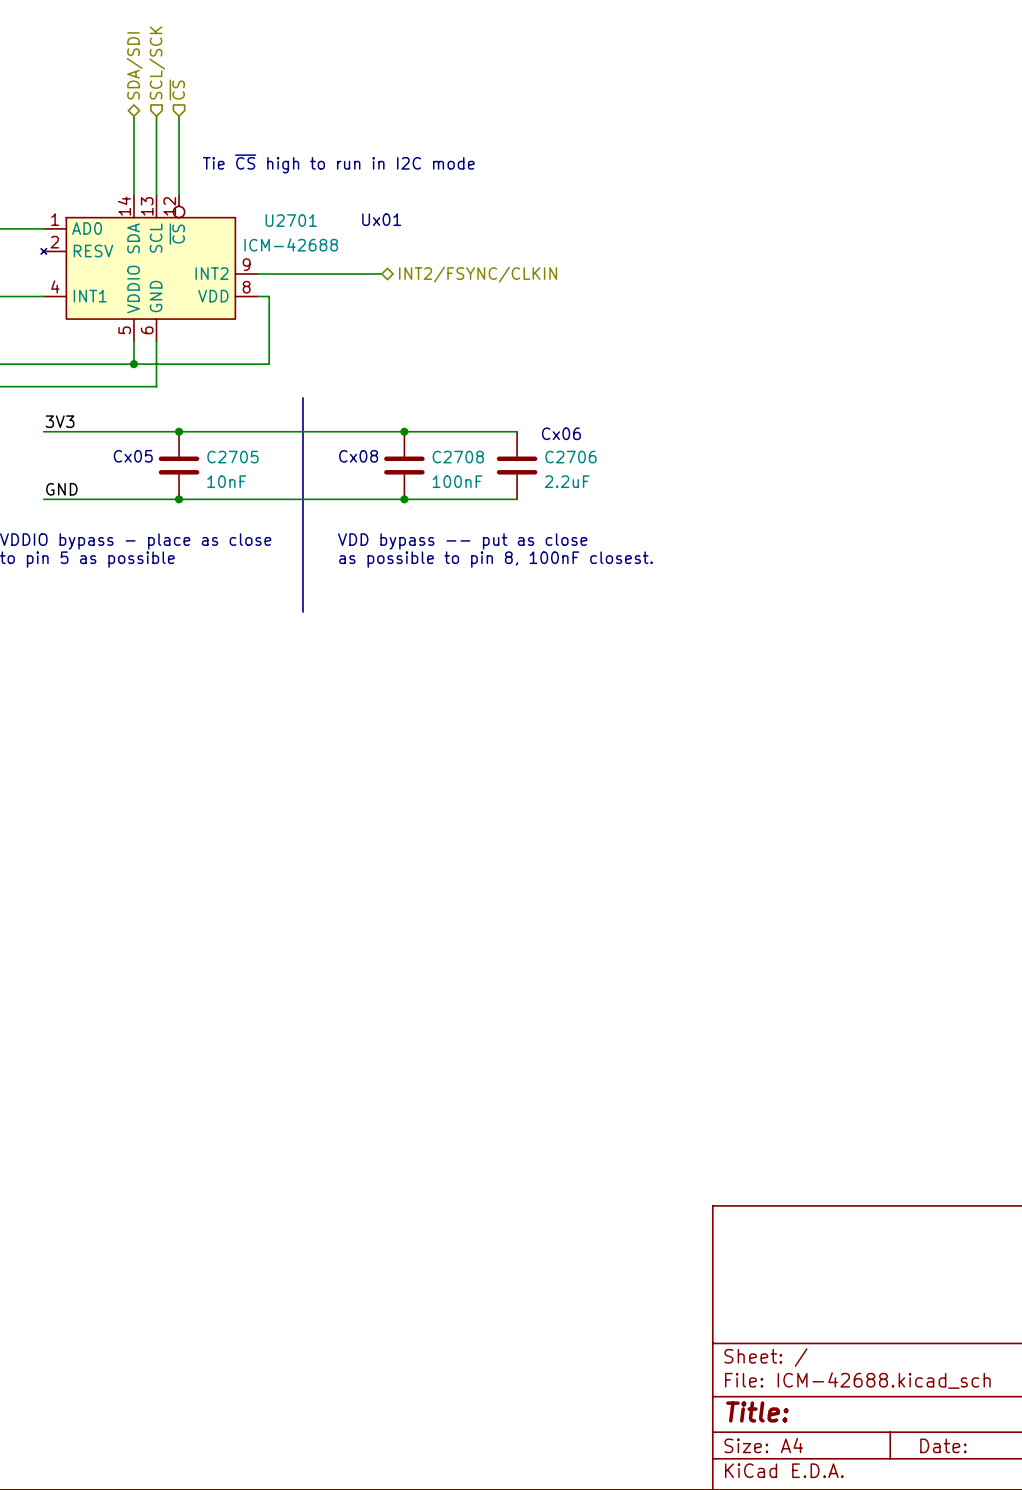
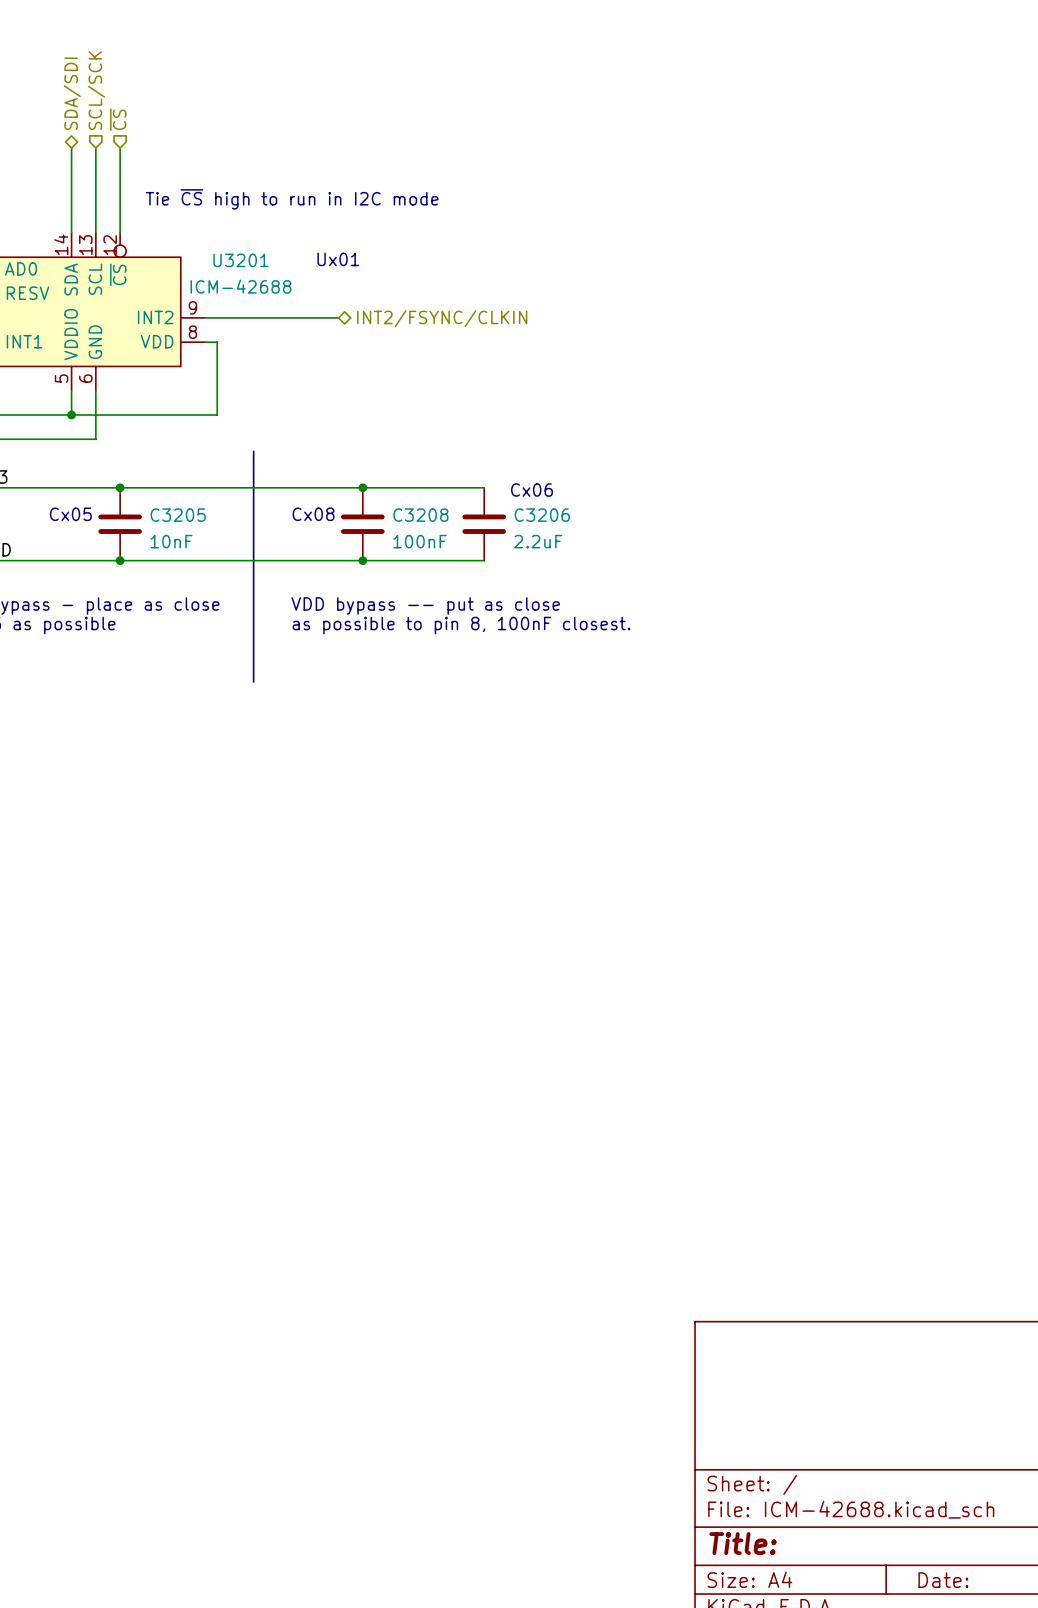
U2701 name: U2701 (291, 220) -> U3201 (240, 260)
C2705 name: C2705 (232, 457) -> C3205 (178, 515)
C2708 name: C2708 (458, 457) -> C3208 (420, 515)
C2706 name: C2706 (570, 457) -> C3206 (542, 515)

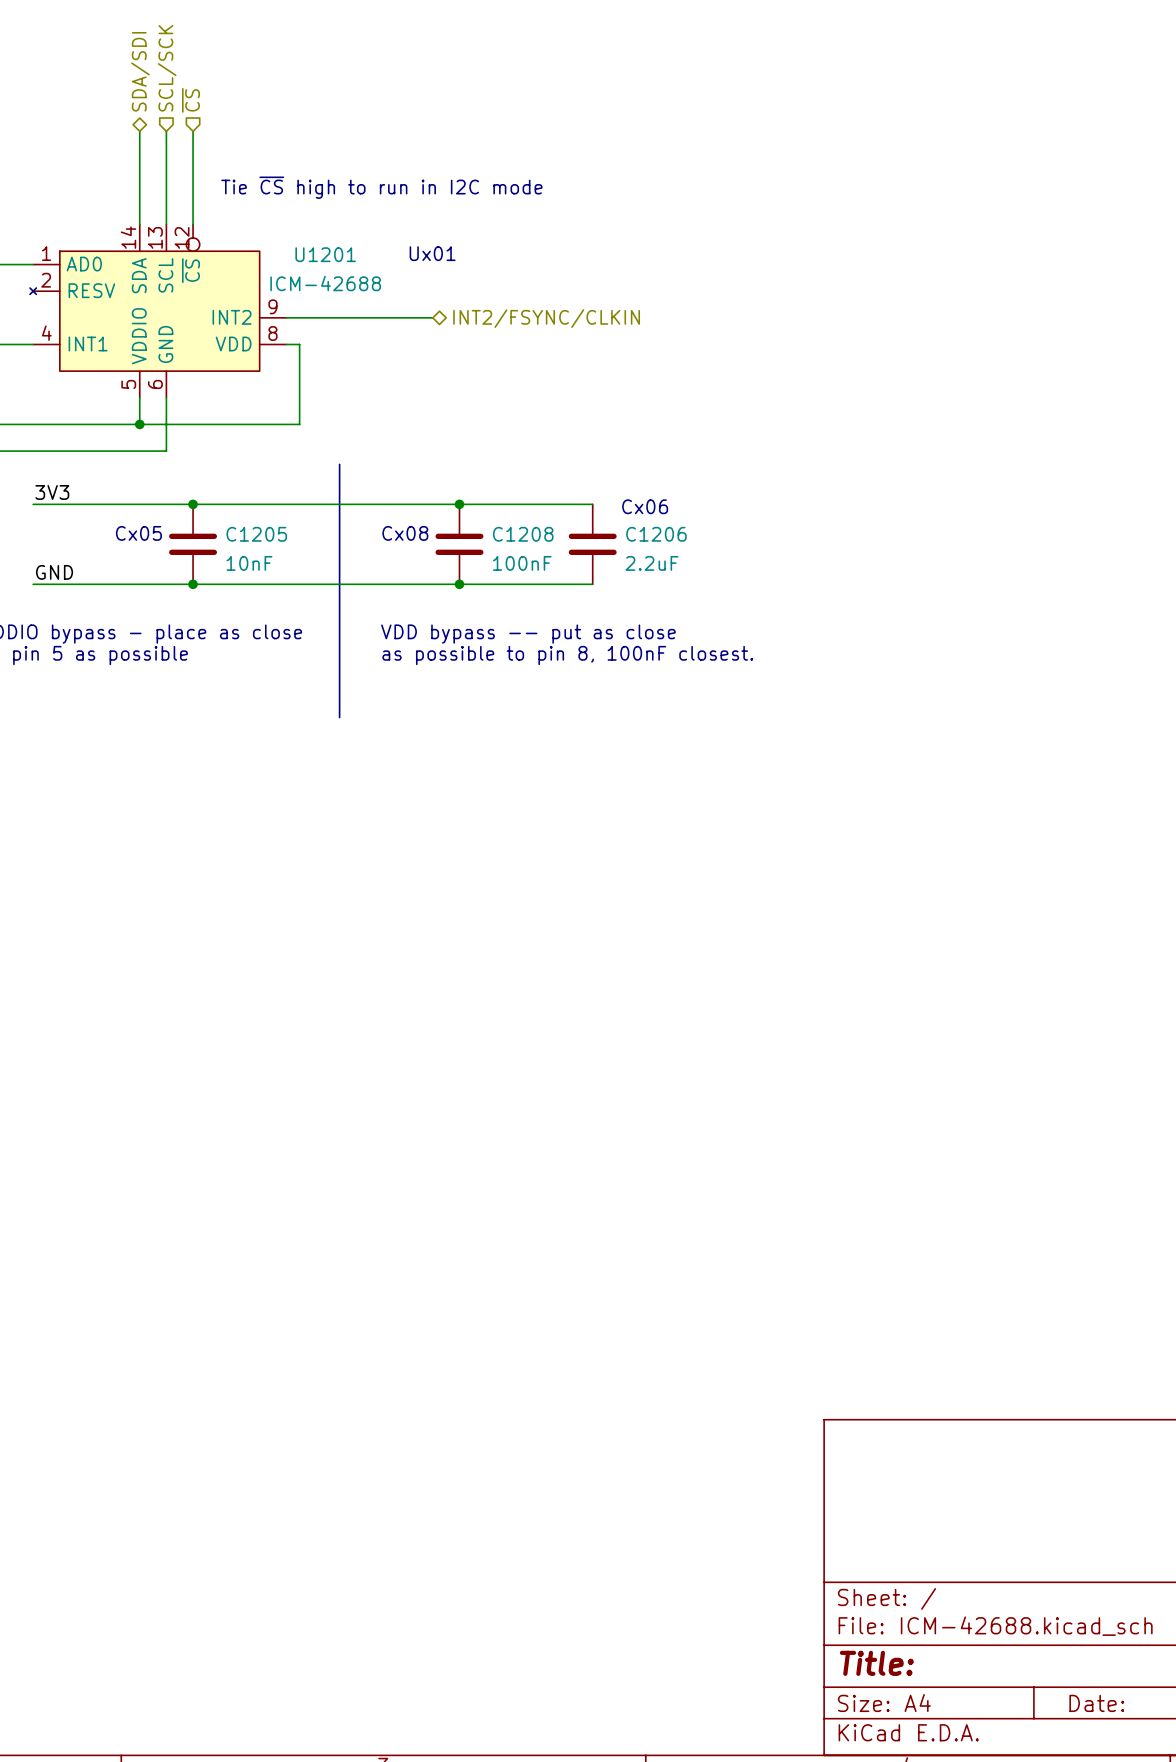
U3201 name: U3201 (240, 260) -> U1201 (325, 254)
C3205 name: C3205 (178, 515) -> C1205 (256, 534)
C3208 name: C3208 (420, 515) -> C1208 (523, 534)
C3206 name: C3206 (542, 515) -> C1206 (656, 534)

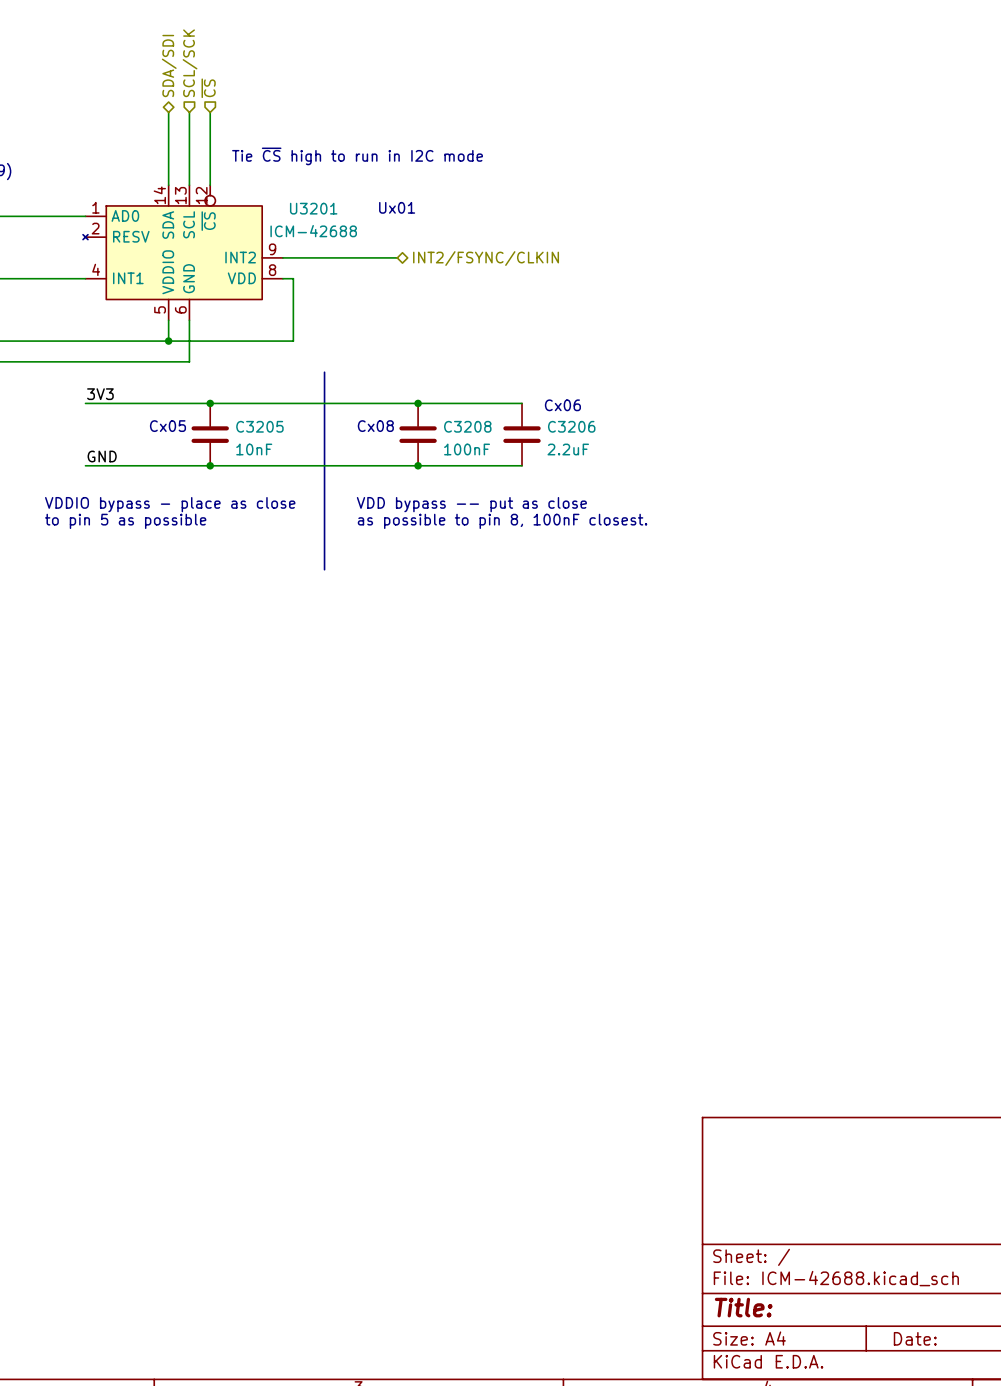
U1201 name: U1201 (325, 254) -> U3201 (313, 208)
C1205 name: C1205 (256, 534) -> C3205 (259, 426)
C1208 name: C1208 (523, 534) -> C3208 (467, 426)
C1206 name: C1206 (656, 534) -> C3206 (571, 426)

